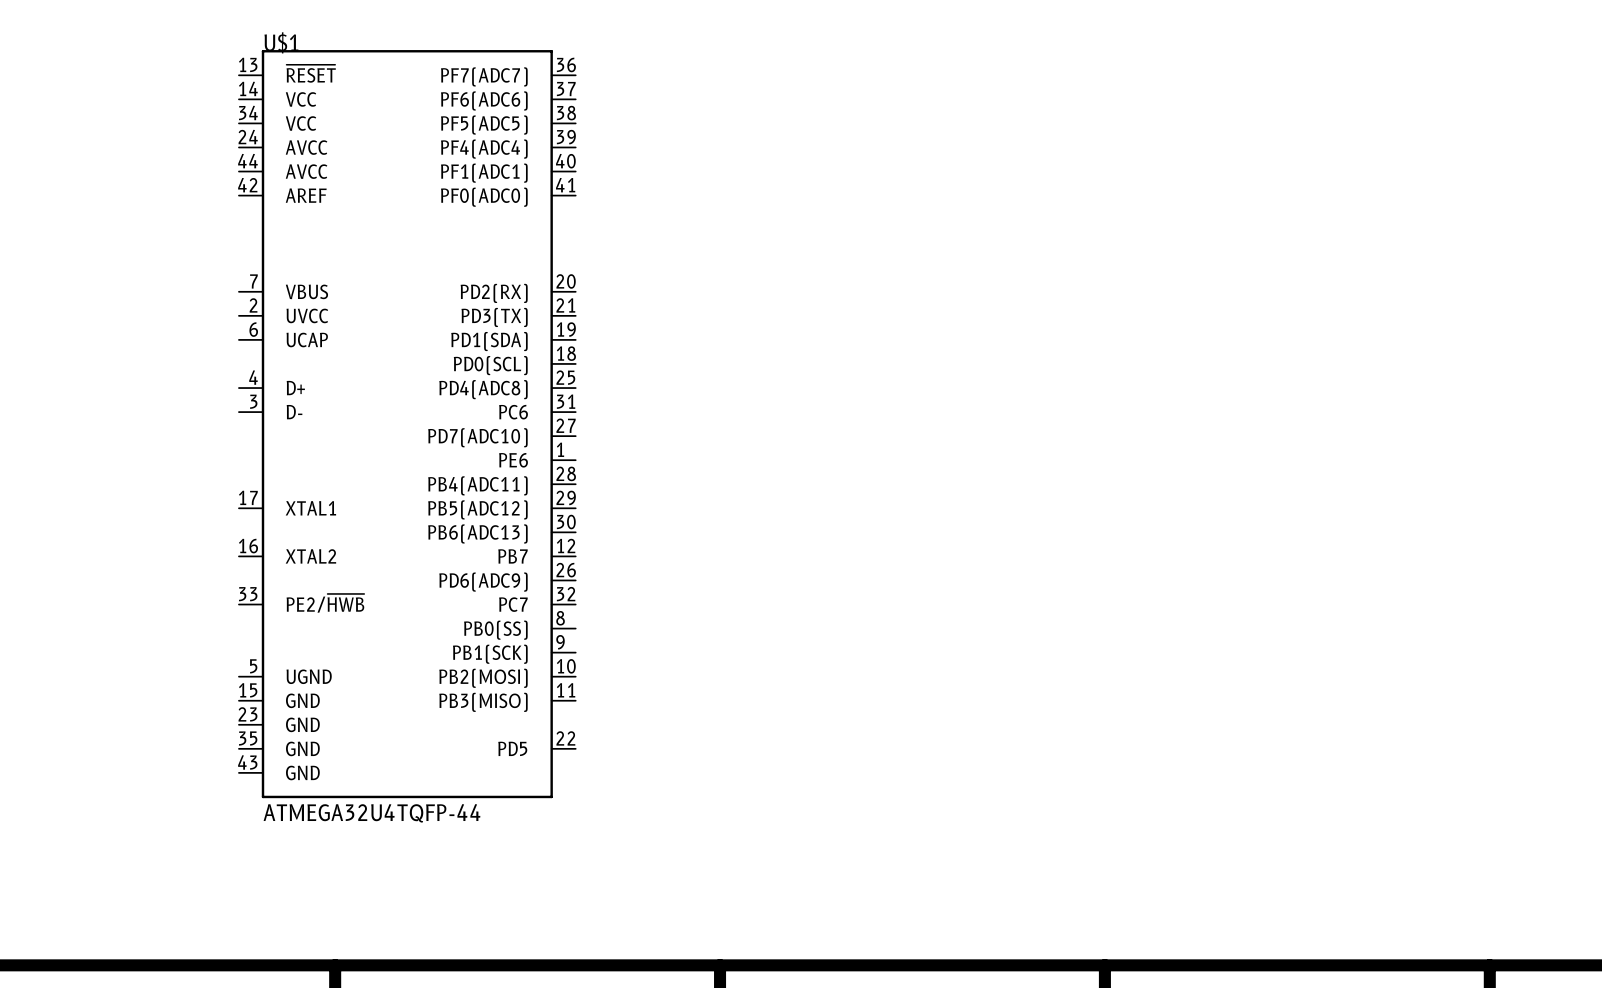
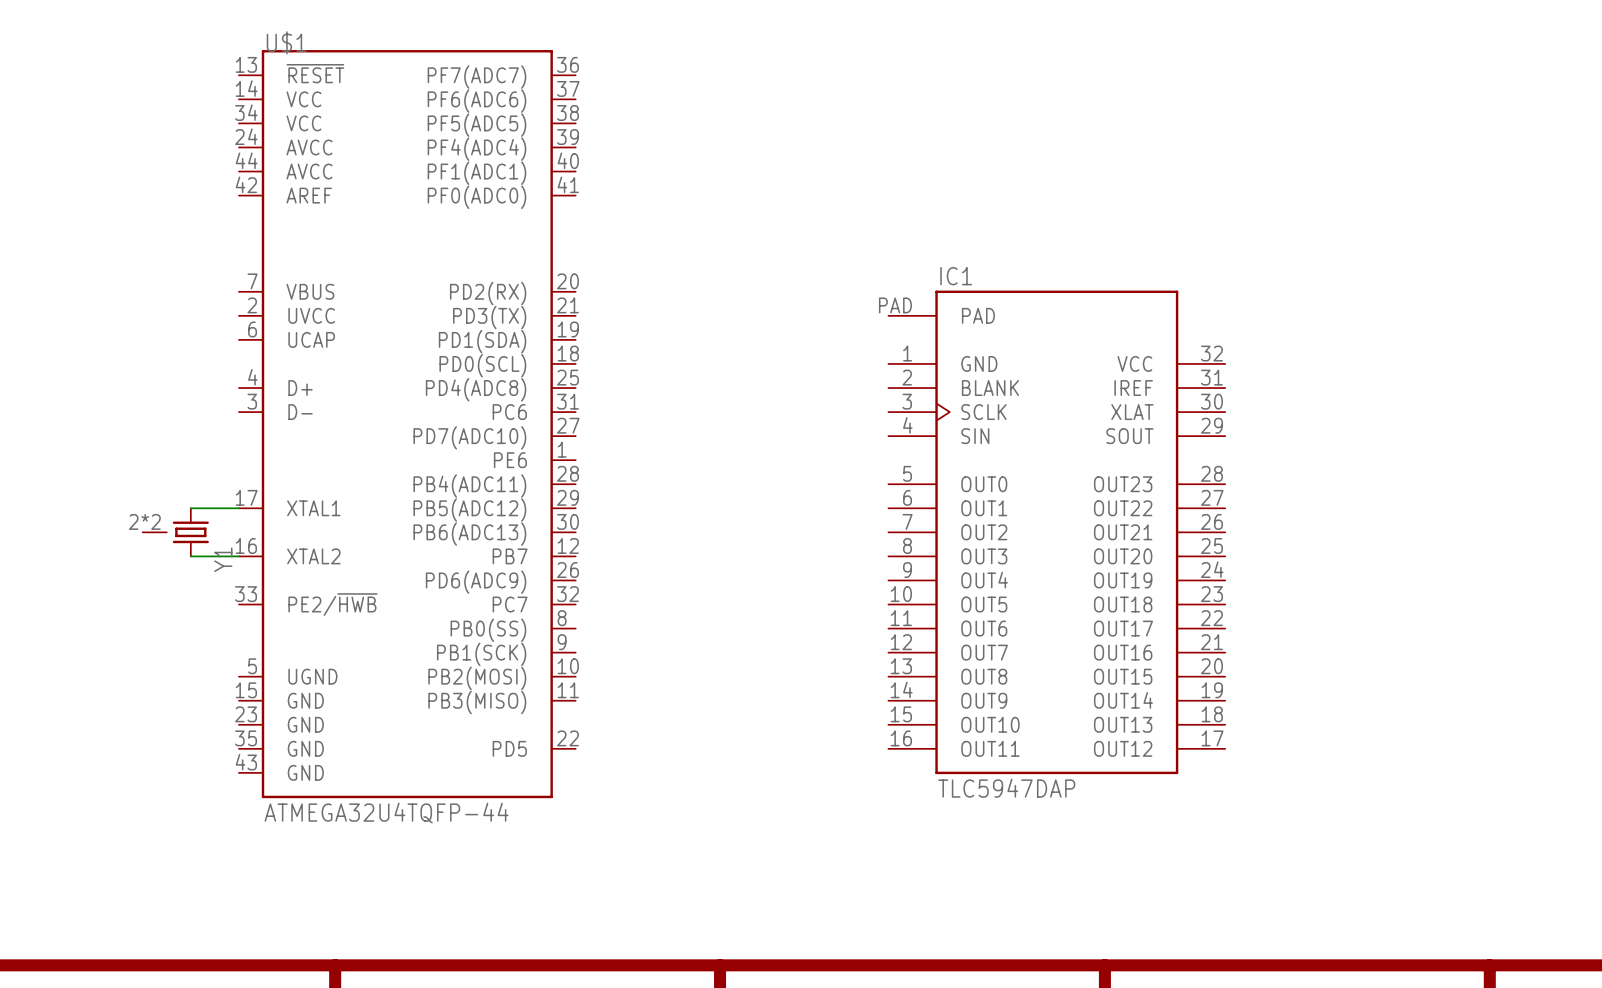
wire: none -> (190, 508) (238, 508)
Y1: none -> (175, 532)
IC1: none -> TLC5947DAP (1056, 532)
wire: none -> (190, 556) (238, 556)

